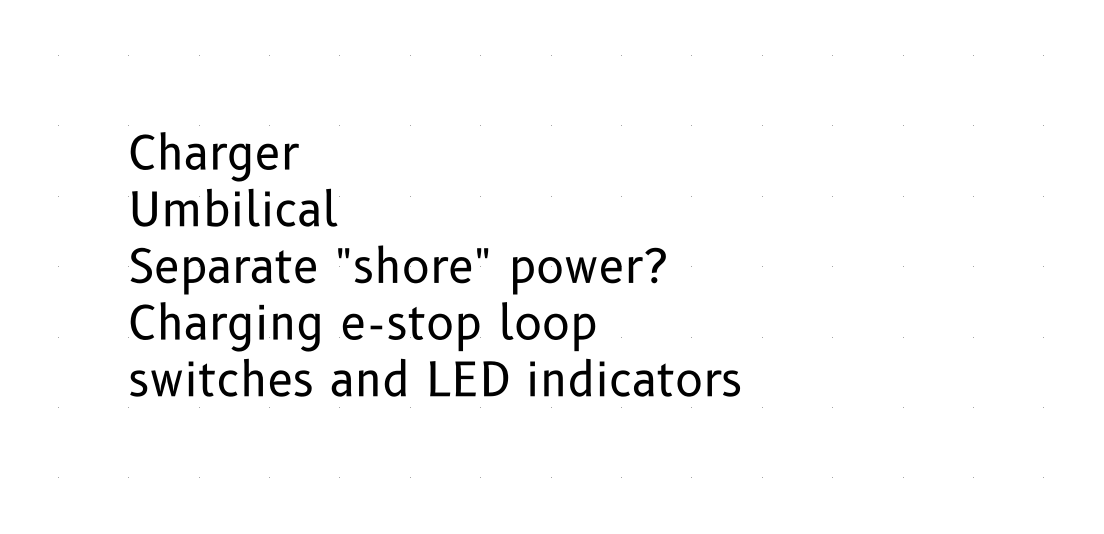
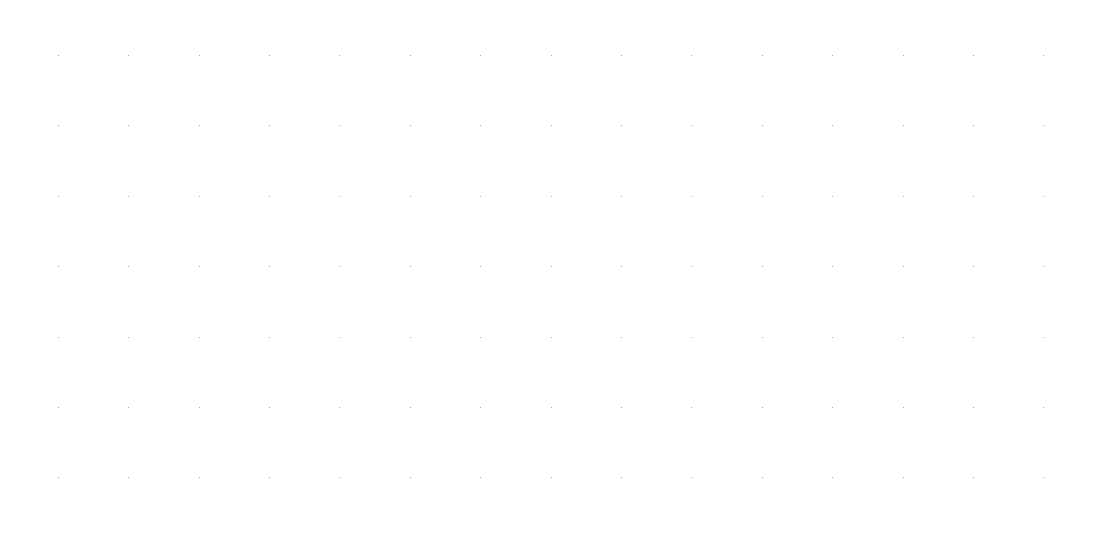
text: Charger (214, 156) -> none
text: Umbilical (234, 207) -> none
text: Separate "shore" power? (398, 269) -> none
text: Charging e-stop loop (362, 326) -> none
text: switches and LED indicators (435, 377) -> none

